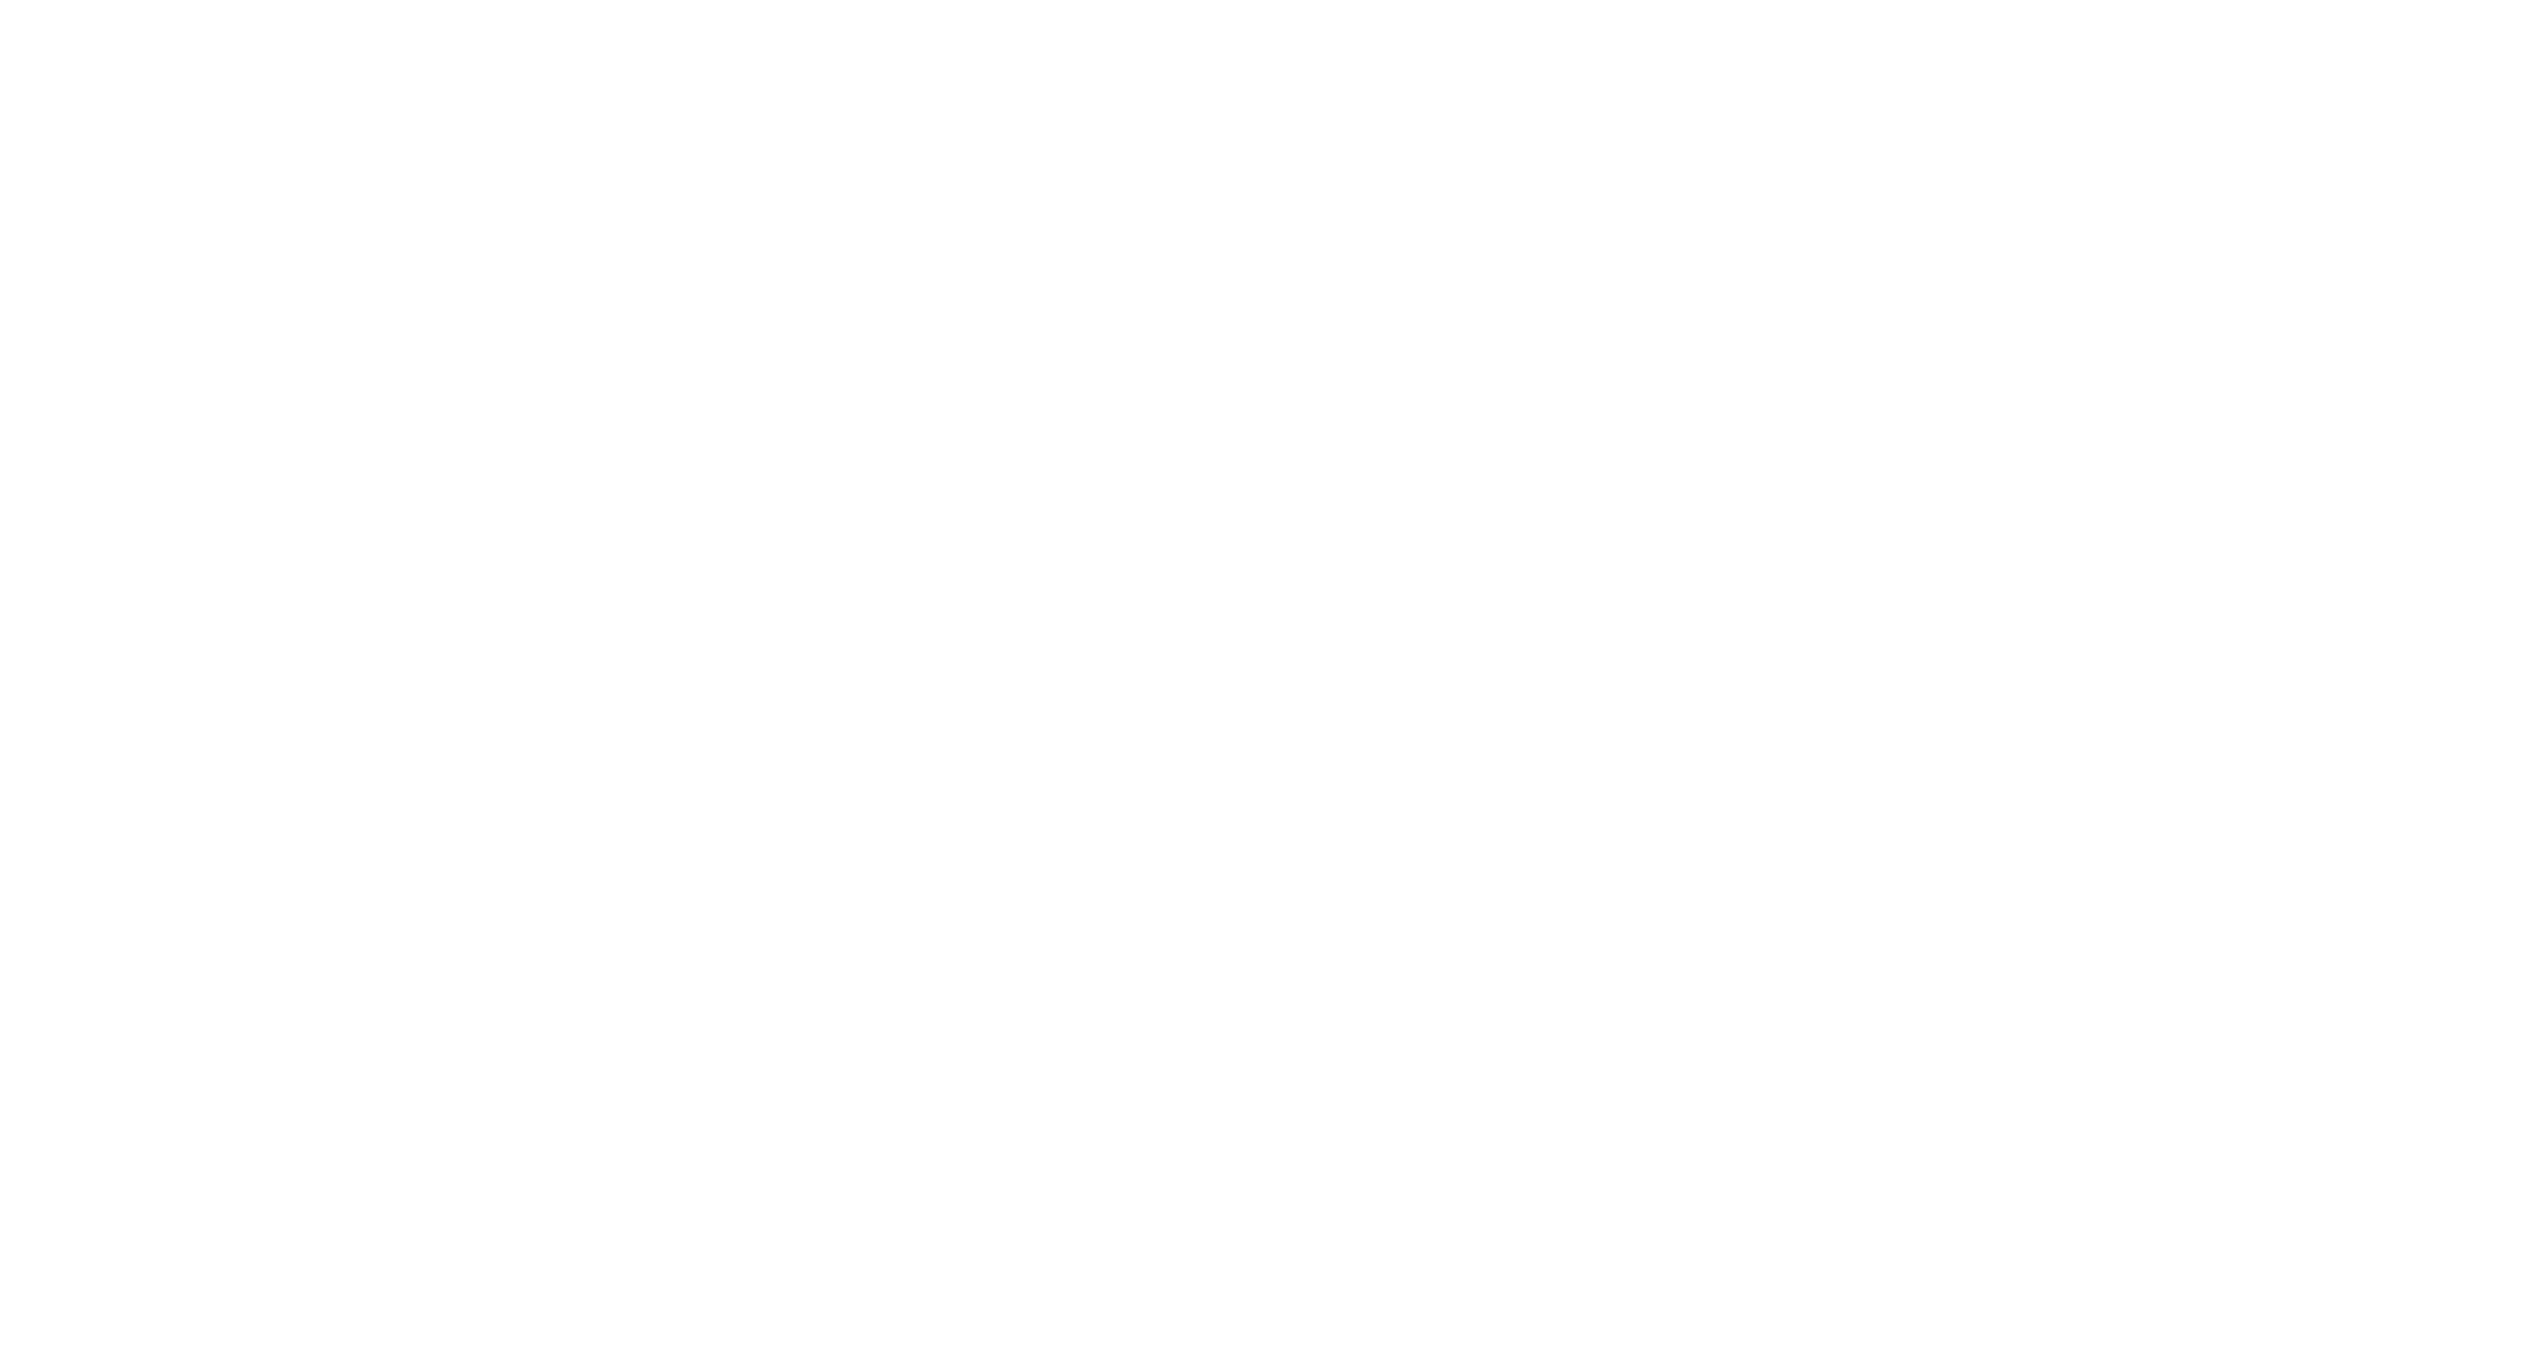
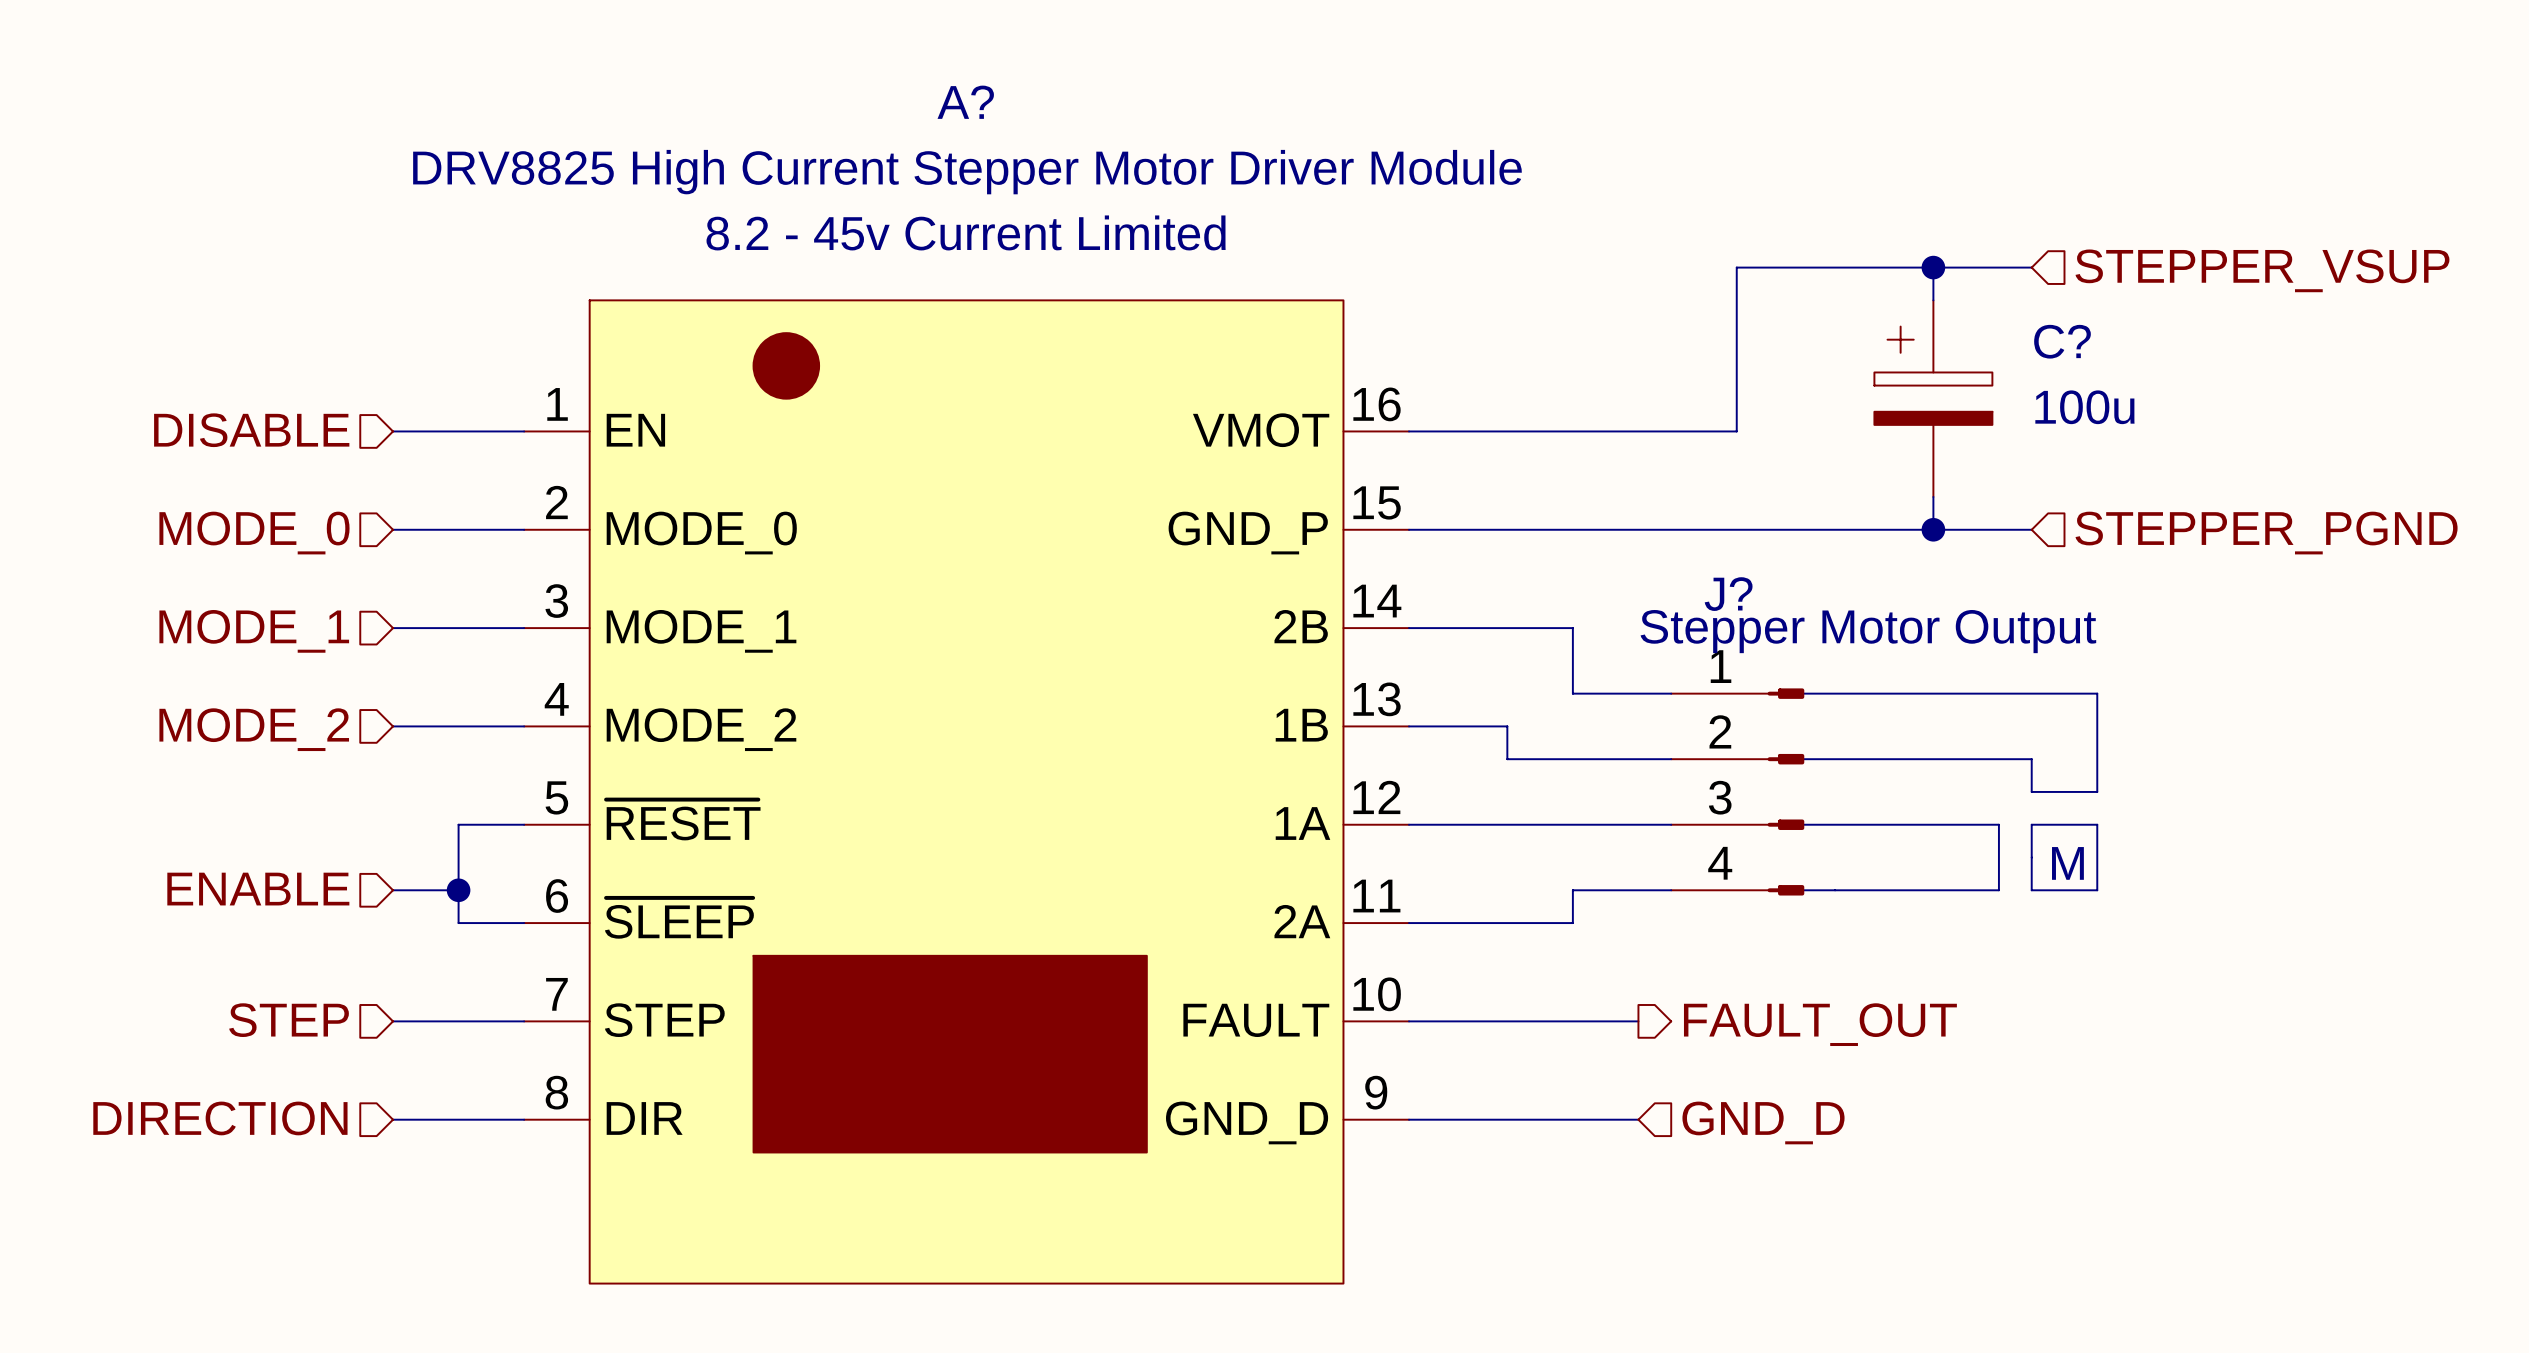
wire: none -> (1933, 267) (1933, 300)
junction: none -> (1933, 267)
wire: none -> (2031, 267) (1736, 267) (1736, 431) (1409, 431)
hierarchical label: none -> STEPPER_VSUP (2262, 270)
C?: none -> 100u (1933, 398)
hierarchical label: none -> DISABLE (251, 430)
wire: none -> (393, 431) (524, 431)
wire: none -> (1933, 497) (1933, 529)
wire: none -> (393, 529) (524, 529)
wire: none -> (1409, 529) (2031, 529)
junction: none -> (1933, 529)
hierarchical label: none -> MODE_0 (254, 533)
hierarchical label: none -> STEPPER_PGND (2266, 533)
wire: none -> (393, 628) (524, 628)
wire: none -> (1409, 628) (1572, 628) (1572, 693) (1671, 693)
hierarchical label: none -> MODE_1 (254, 631)
line: none -> (1802, 693) (2097, 693) (2097, 791) (2031, 791) (2031, 759) (1802, 759)
wire: none -> (393, 726) (524, 726)
wire: none -> (1409, 726) (1507, 726) (1507, 759) (1671, 759)
hierarchical label: none -> MODE_2 (254, 729)
A?: none -> DRV8825 High Current Stepper Motor Driver Module (966, 791)
J?: none -> Stepper Motor Output (1737, 791)
wire: none -> (524, 824) (458, 824) (458, 923) (524, 923)
wire: none -> (1409, 824) (1671, 824)
line: none -> (1802, 824) (1998, 824) (1998, 890) (1802, 890)
line: none -> (2031, 824) (2031, 890) (2097, 890) (2097, 824) (2031, 824)
text: none -> M (2067, 863)
hierarchical label: none -> ENABLE (258, 889)
wire: none -> (393, 890) (458, 890)
junction: none -> (458, 890)
wire: none -> (1671, 890) (1572, 890) (1572, 923) (1409, 923)
hierarchical label: none -> STEP (289, 1020)
wire: none -> (393, 1021) (524, 1021)
wire: none -> (1409, 1021) (1638, 1021)
hierarchical label: none -> FAULT_OUT (1820, 1024)
hierarchical label: none -> DIRECTION (220, 1118)
wire: none -> (393, 1119) (524, 1119)
wire: none -> (1409, 1119) (1638, 1119)
hierarchical label: none -> GND_D (1763, 1122)

